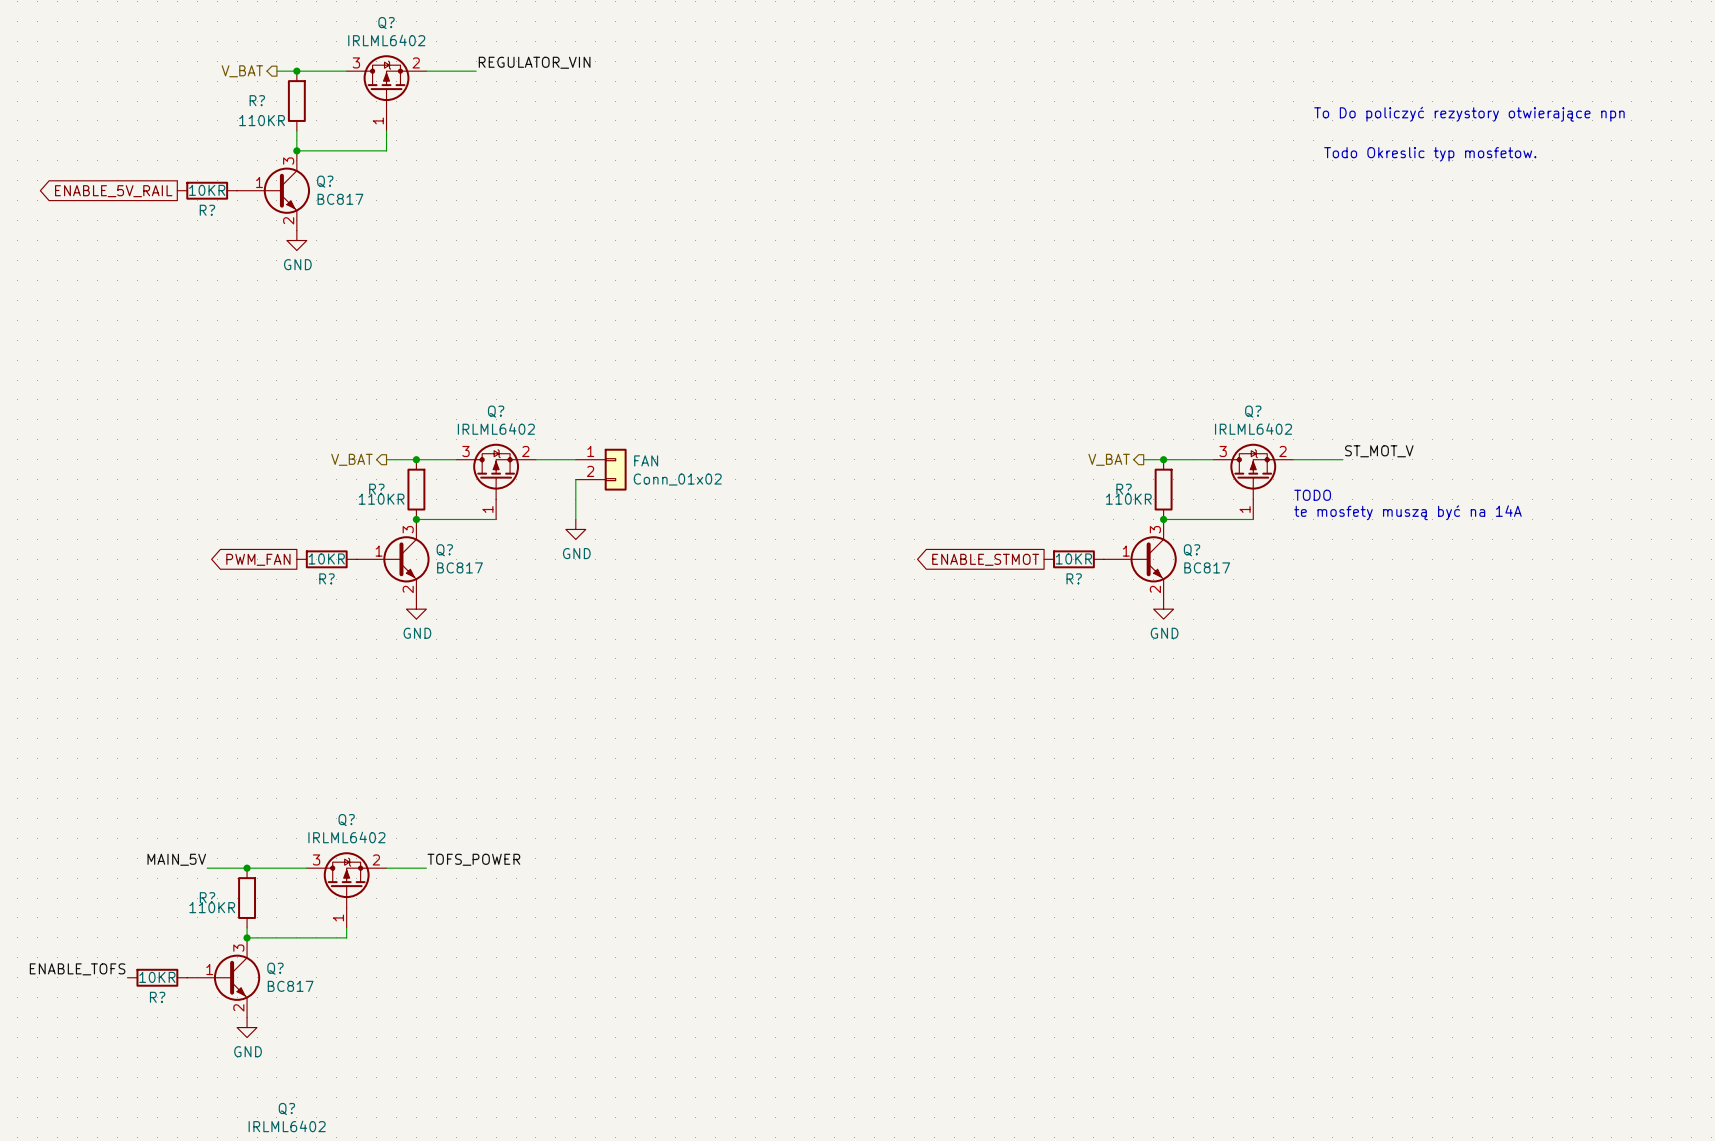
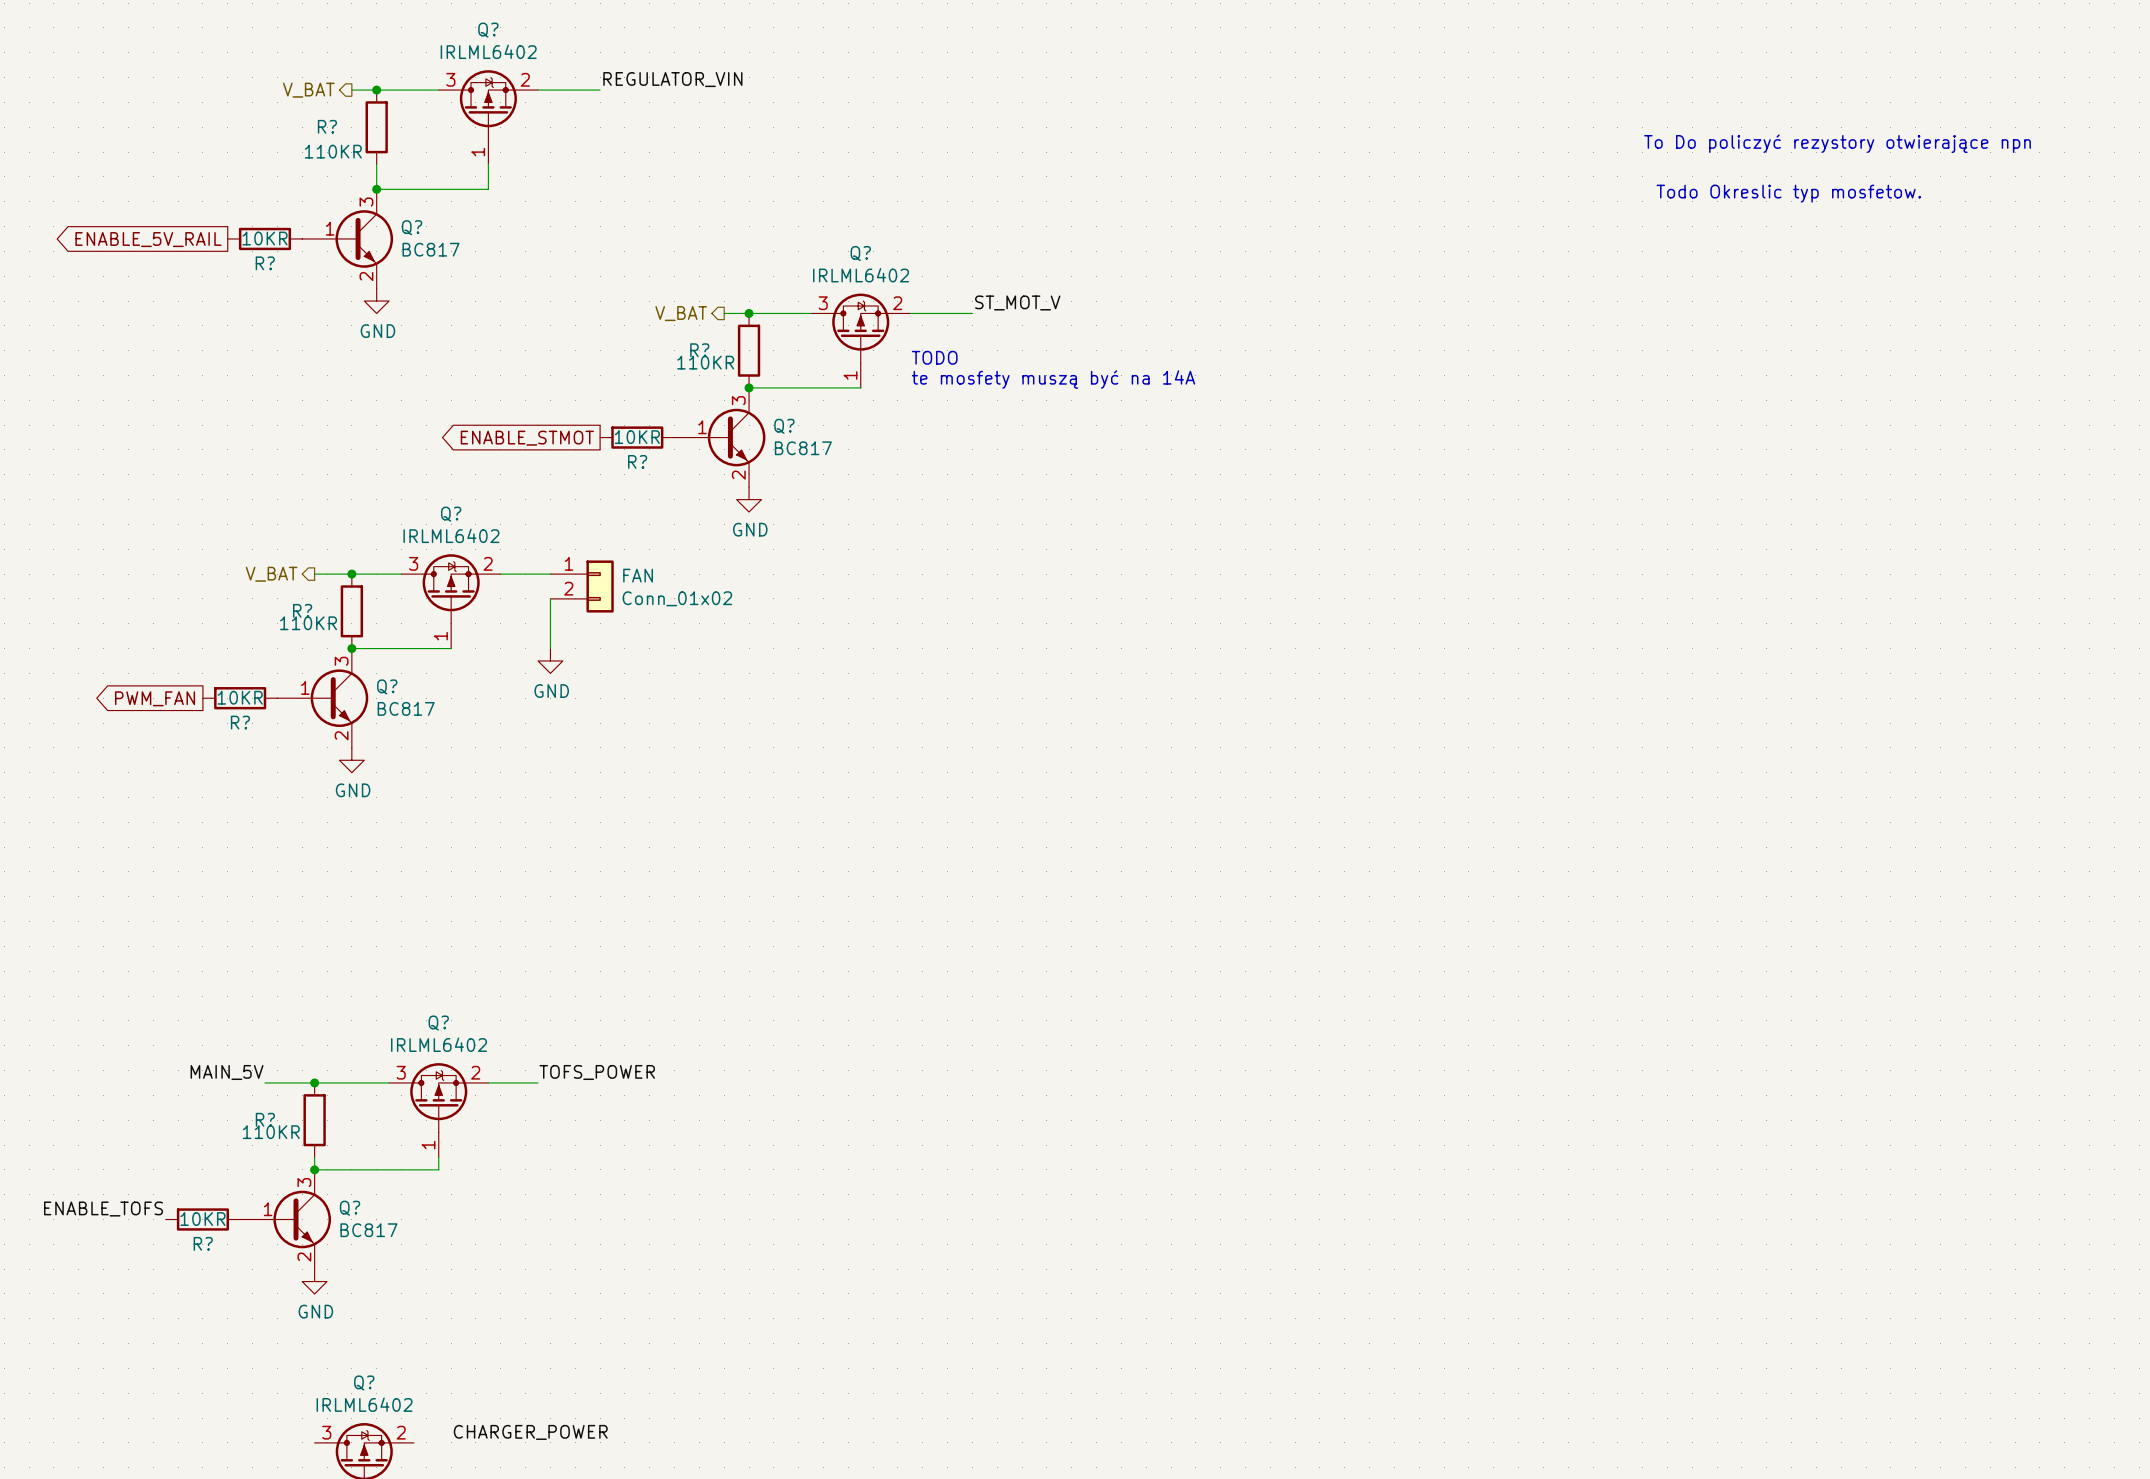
label: none -> ST_MOT_V (1017, 302)
hierarchical label: none -> V_BAT (681, 313)
wire: none -> (724, 313) (811, 313)
junction: none -> (749, 313)
wire: none -> (910, 313) (972, 313)
Q?: none -> IRLML6402 (860, 340)
R?: none -> 110KR (749, 350)
text: none -> TODO (934, 357)
text: none -> te mosfety muszą być na 14A (1053, 379)
wire: none -> (749, 387) (860, 387)
junction: none -> (749, 387)
global label: none -> ENABLE_STMOT (527, 438)
R?: none -> 10KR (637, 437)
Q?: none -> BC817 (719, 437)
power symbol: none -> GND (749, 499)
label: ST_MOT_V (1379, 451) -> none
wire: none -> (314, 574) (401, 574)
junction: none -> (351, 574)
hierarchical label position: V_BAT (351, 459) -> V_BAT (271, 574)
junction: (416, 459) -> none
wire: (535, 459) (575, 459) -> none
hierarchical label: V_BAT (1109, 459) -> none
wire: (1143, 459) (1213, 459) -> none
junction: (1163, 459) -> none
wire: (1293, 459) (1342, 459) -> none
FAN position: (601, 469) -> (582, 586)
wire: (575, 479) (575, 519) -> (550, 598) (550, 648)
Q? position: (496, 481) -> (451, 601)
Q?: IRLML6402 (1253, 481) -> none
R?: none -> 110KR (351, 611)
R?: 110KR (416, 489) -> none
R?: 110KR (1163, 489) -> none
text: TODO (1312, 495) -> none
text: te mosfety muszą być na 14A (1408, 512) -> none
junction: none -> (351, 648)
wire: (416, 519) (496, 519) -> (351, 648) (451, 648)
junction: (416, 519) -> none
wire: (1163, 519) (1253, 519) -> none
junction: (1163, 519) -> none
power symbol: none -> GND (550, 660)
power symbol: GND (575, 529) -> none
R?: none -> 10KR (240, 698)
Q?: none -> BC817 (322, 698)
global label position: PWM_FAN (258, 559) -> PWM_FAN (155, 698)
R?: 10KR (326, 559) -> none
Q?: BC817 (393, 559) -> none
global label: ENABLE_STMOT (985, 559) -> none
R?: 10KR (1073, 559) -> none
Q?: BC817 (1140, 559) -> none
power symbol: none -> GND (351, 760)
power symbol: GND (416, 609) -> none
power symbol: GND (1163, 609) -> none

